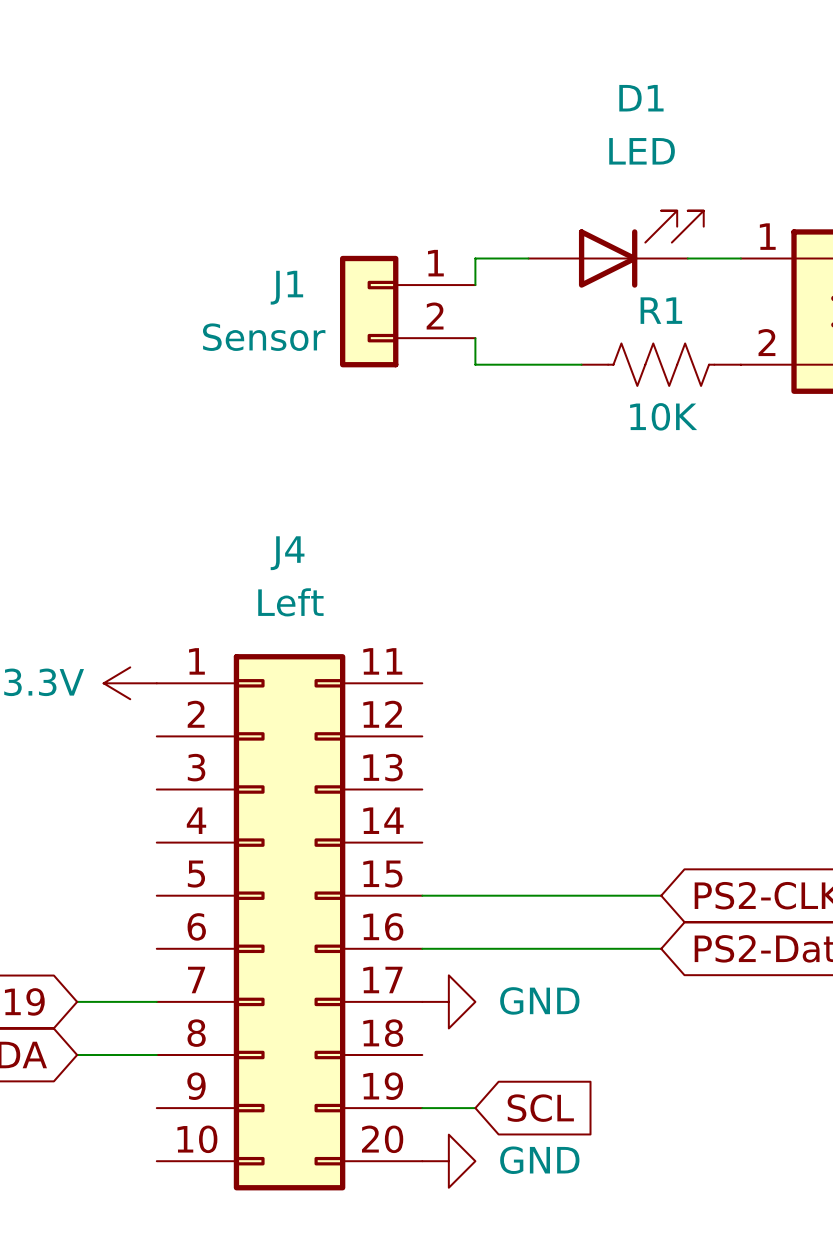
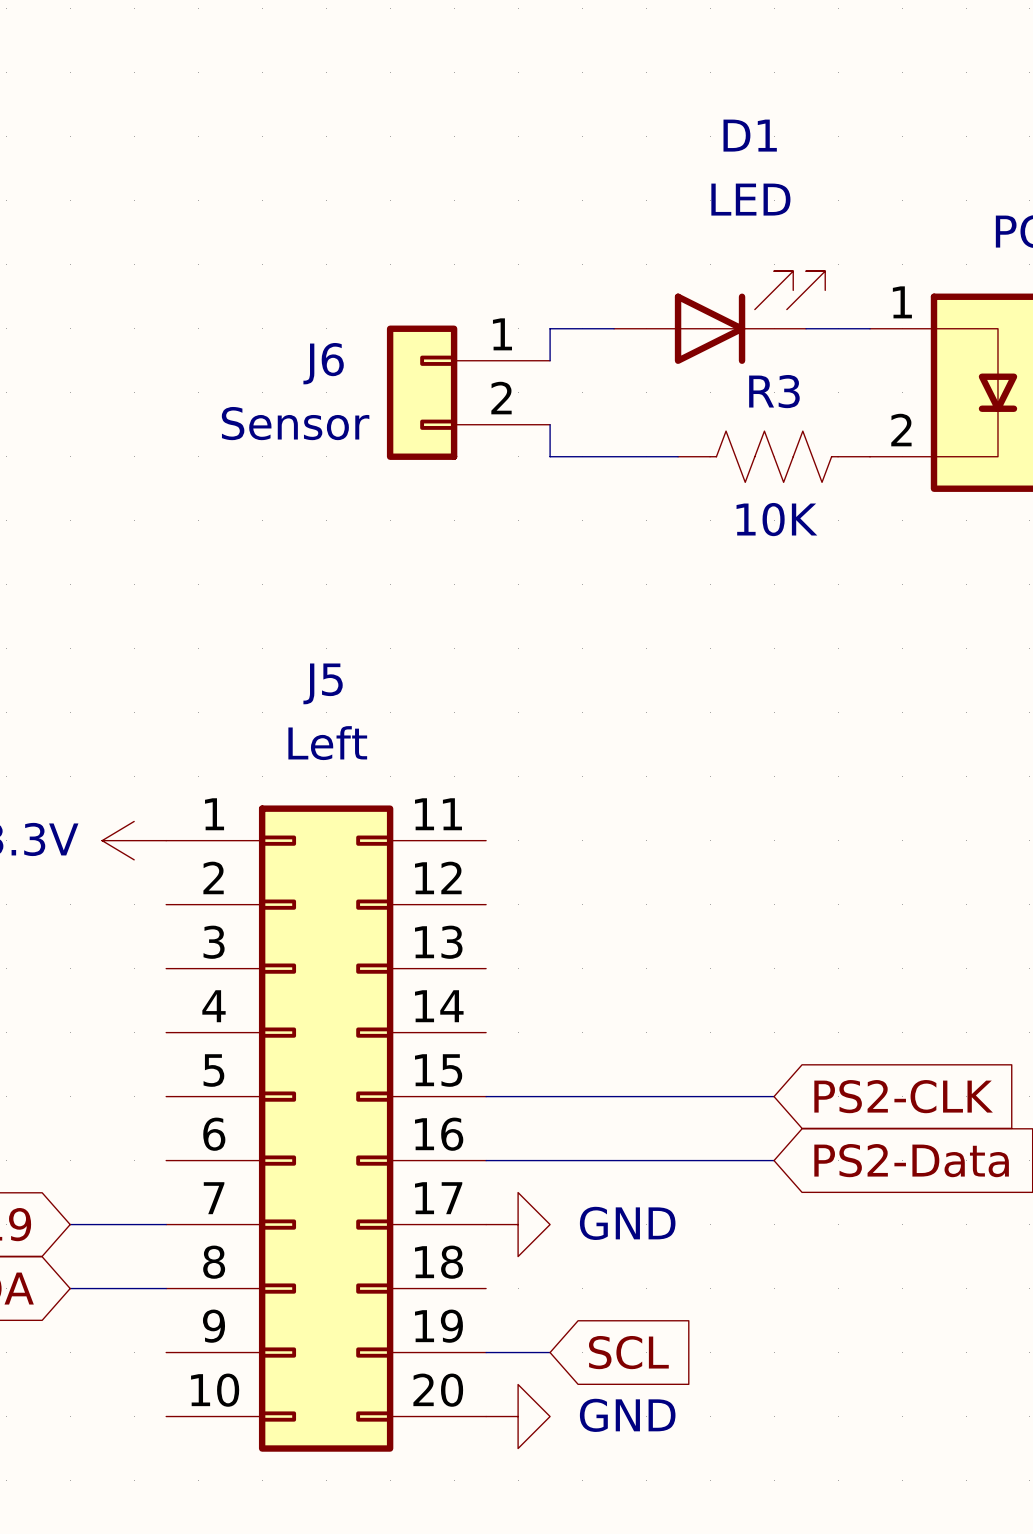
J1 name: J1 (286, 287) -> J6 (323, 363)
R1 name: R1 (661, 310) -> R3 (774, 391)
J4 name: J4 (287, 553) -> J5 (323, 683)

